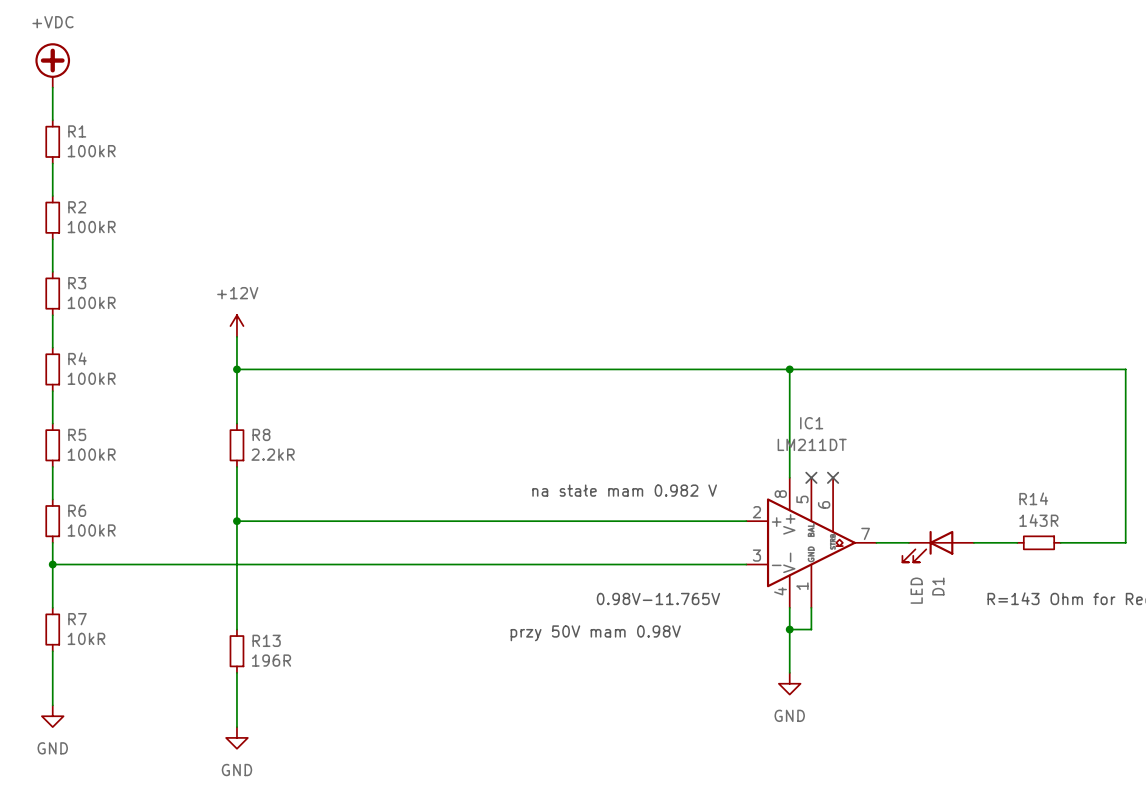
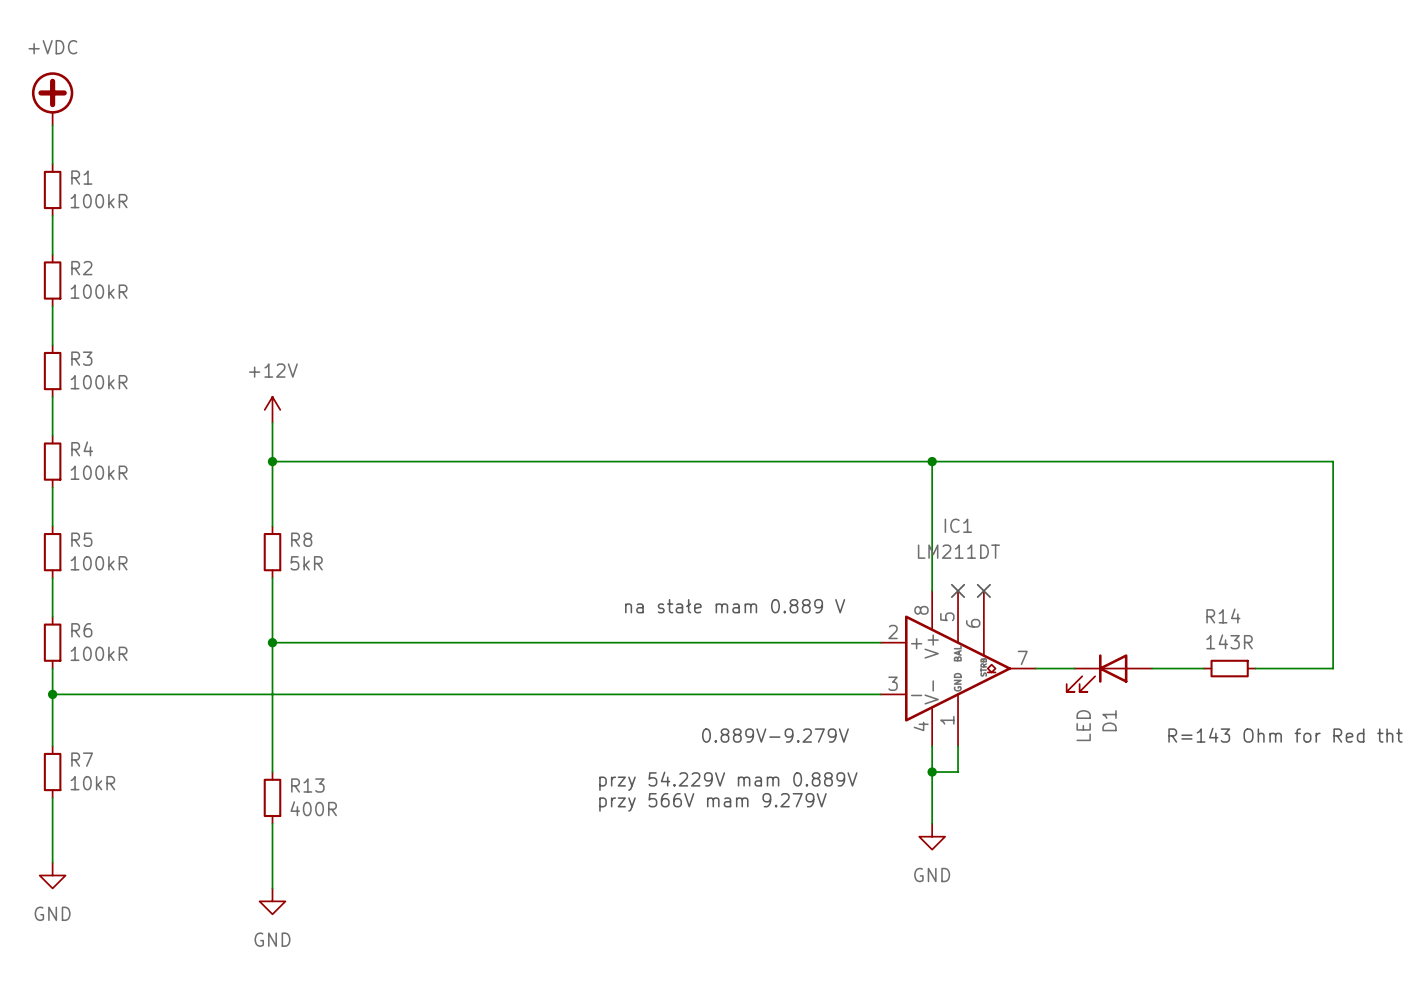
R8 value: 2.2kR (273, 454) -> 5kR (306, 563)
text: na stałe mam 0.982 V (624, 490) -> na stałe mam 0.889 V (735, 606)
text: 0.98V-11.765V (658, 598) -> 0.889V-9.279V (775, 735)
text: przy 50V mam 0.98V (595, 633) -> przy 54.229V mam 0.889V (728, 781)
text: none -> przy 566V mam 9.279V (712, 802)
R13 value: 196R (271, 660) -> 400R (313, 808)

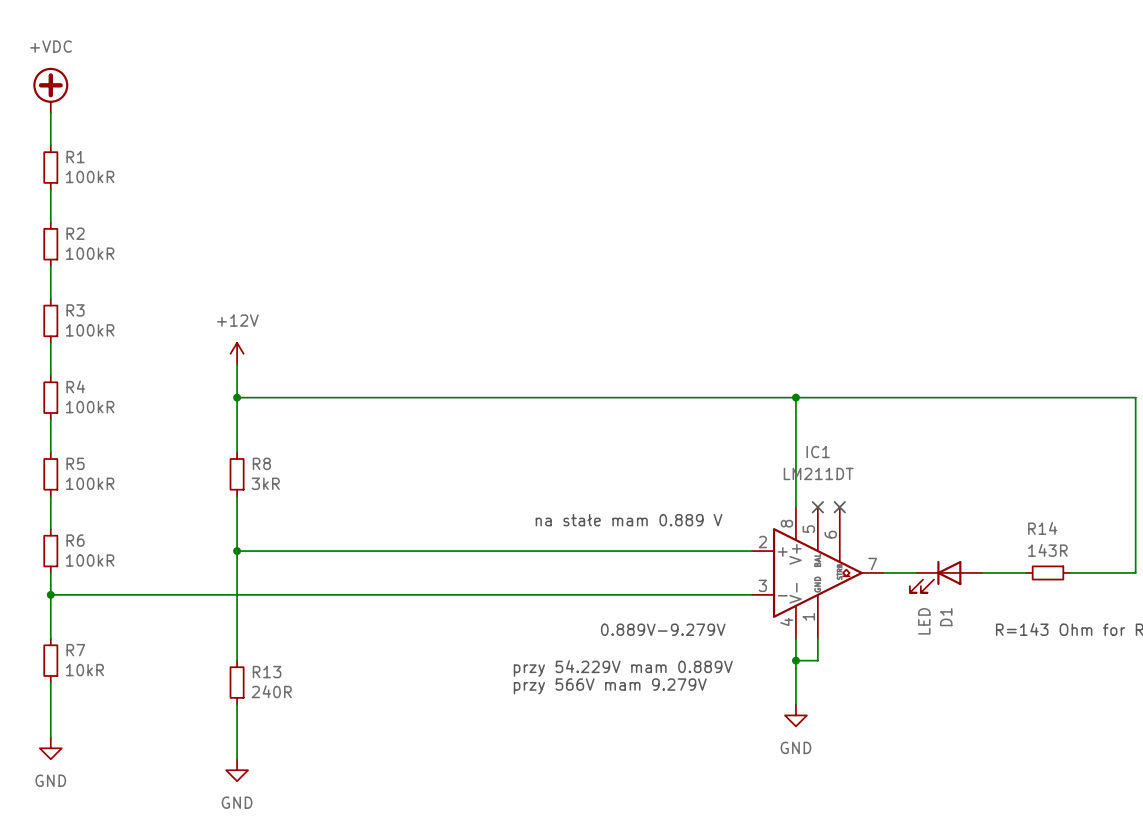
R8 value: 5kR (306, 563) -> 3kR (265, 483)
R13 value: 400R (313, 808) -> 240R (271, 691)

